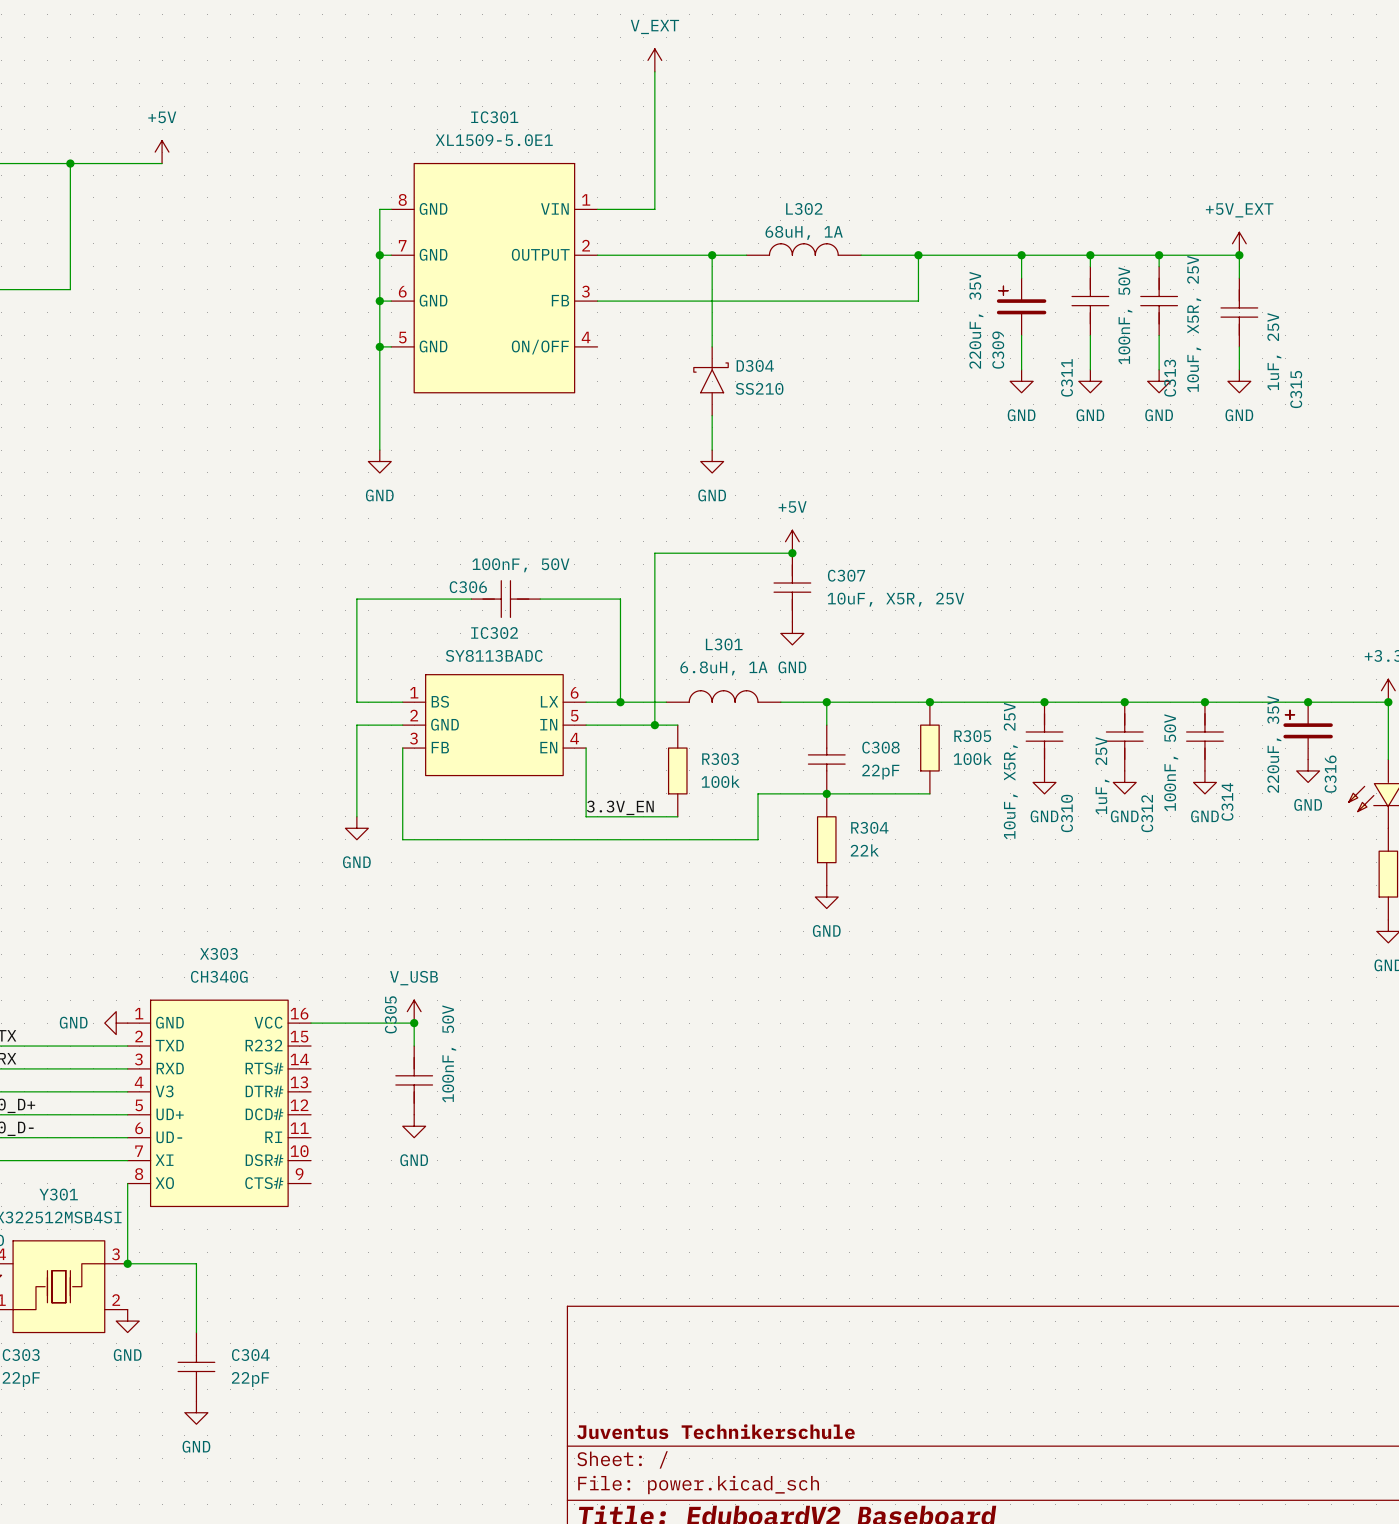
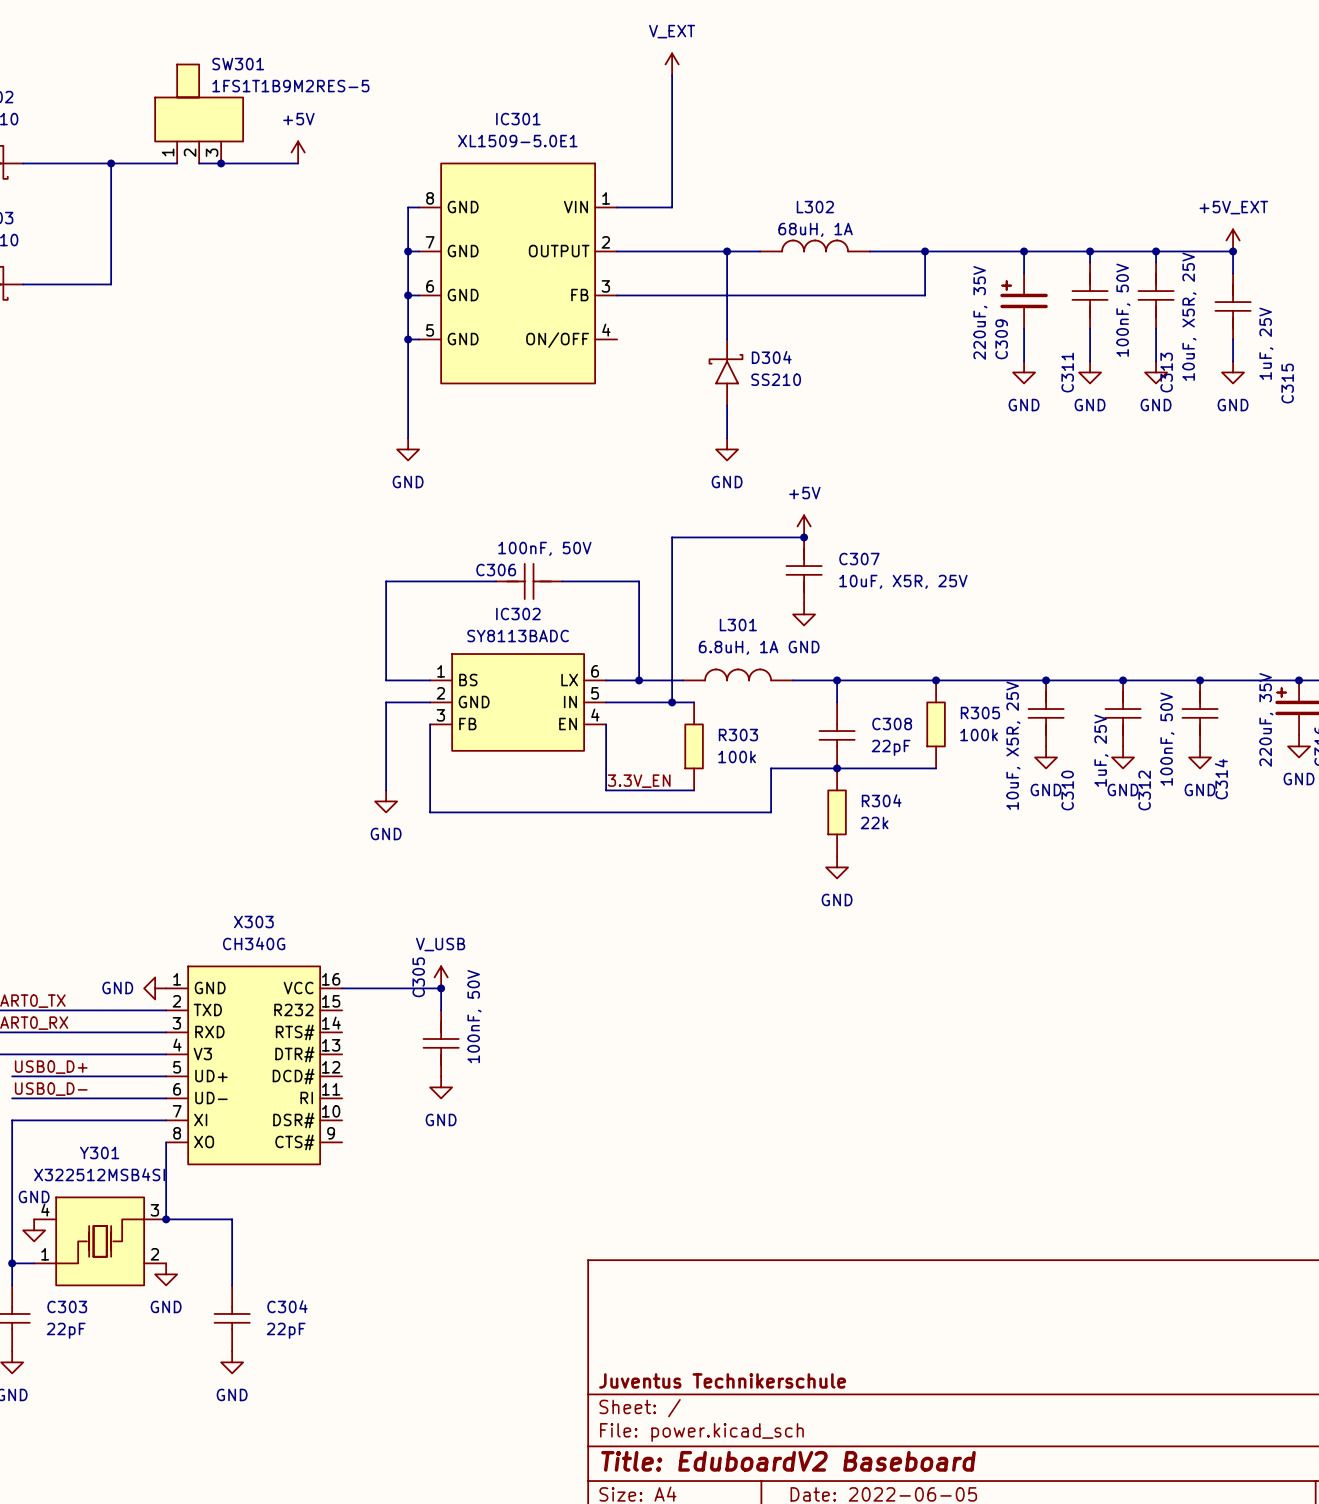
SW301: none -> 1FS1T1B9M2RES-5 (199, 113)
power symbol position: +5V (162, 152) -> +5V (298, 152)
wire: (139, 163) (162, 163) -> (298, 163) (199, 163)
junction: none -> (221, 163)

